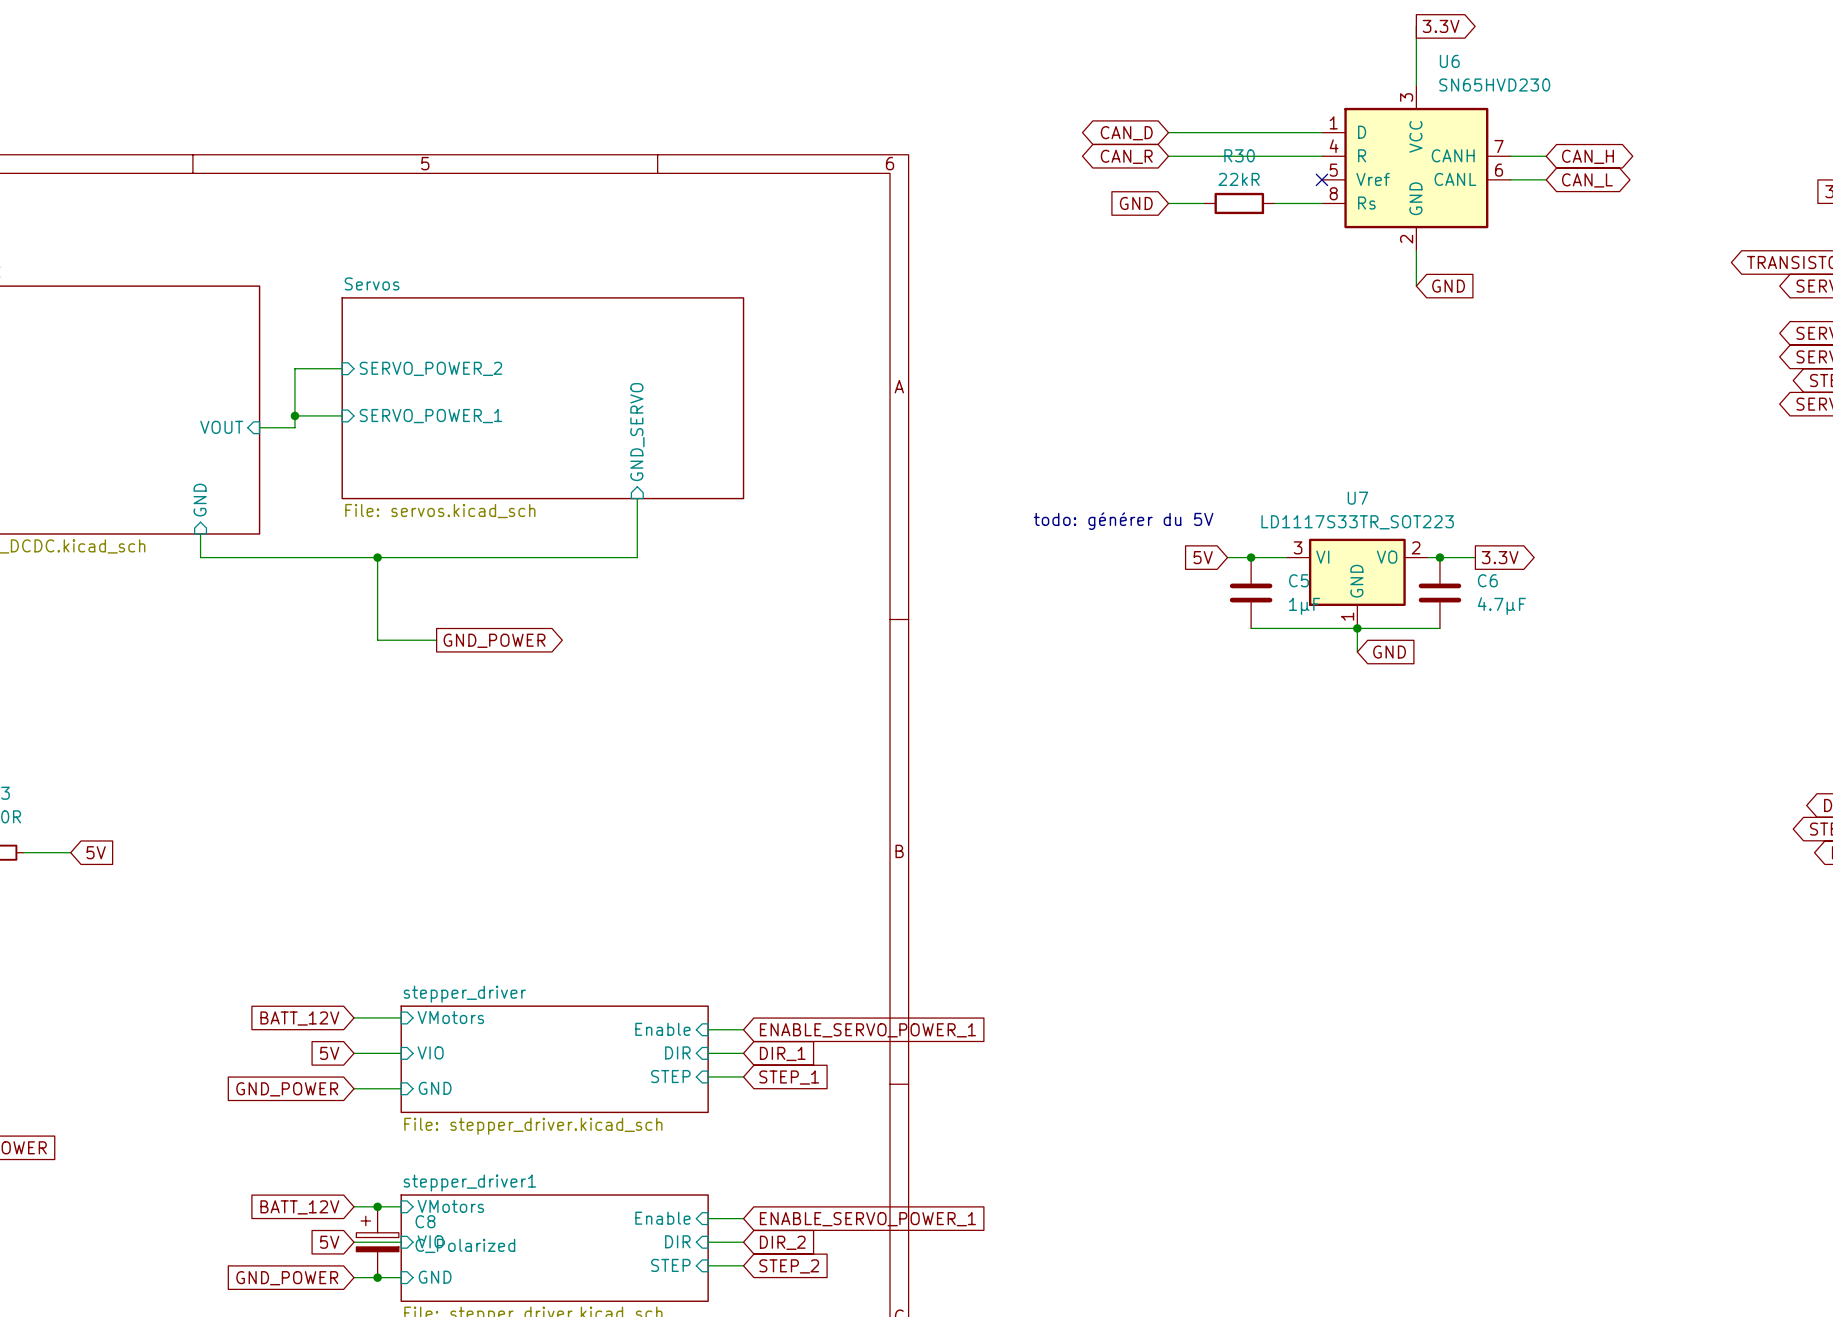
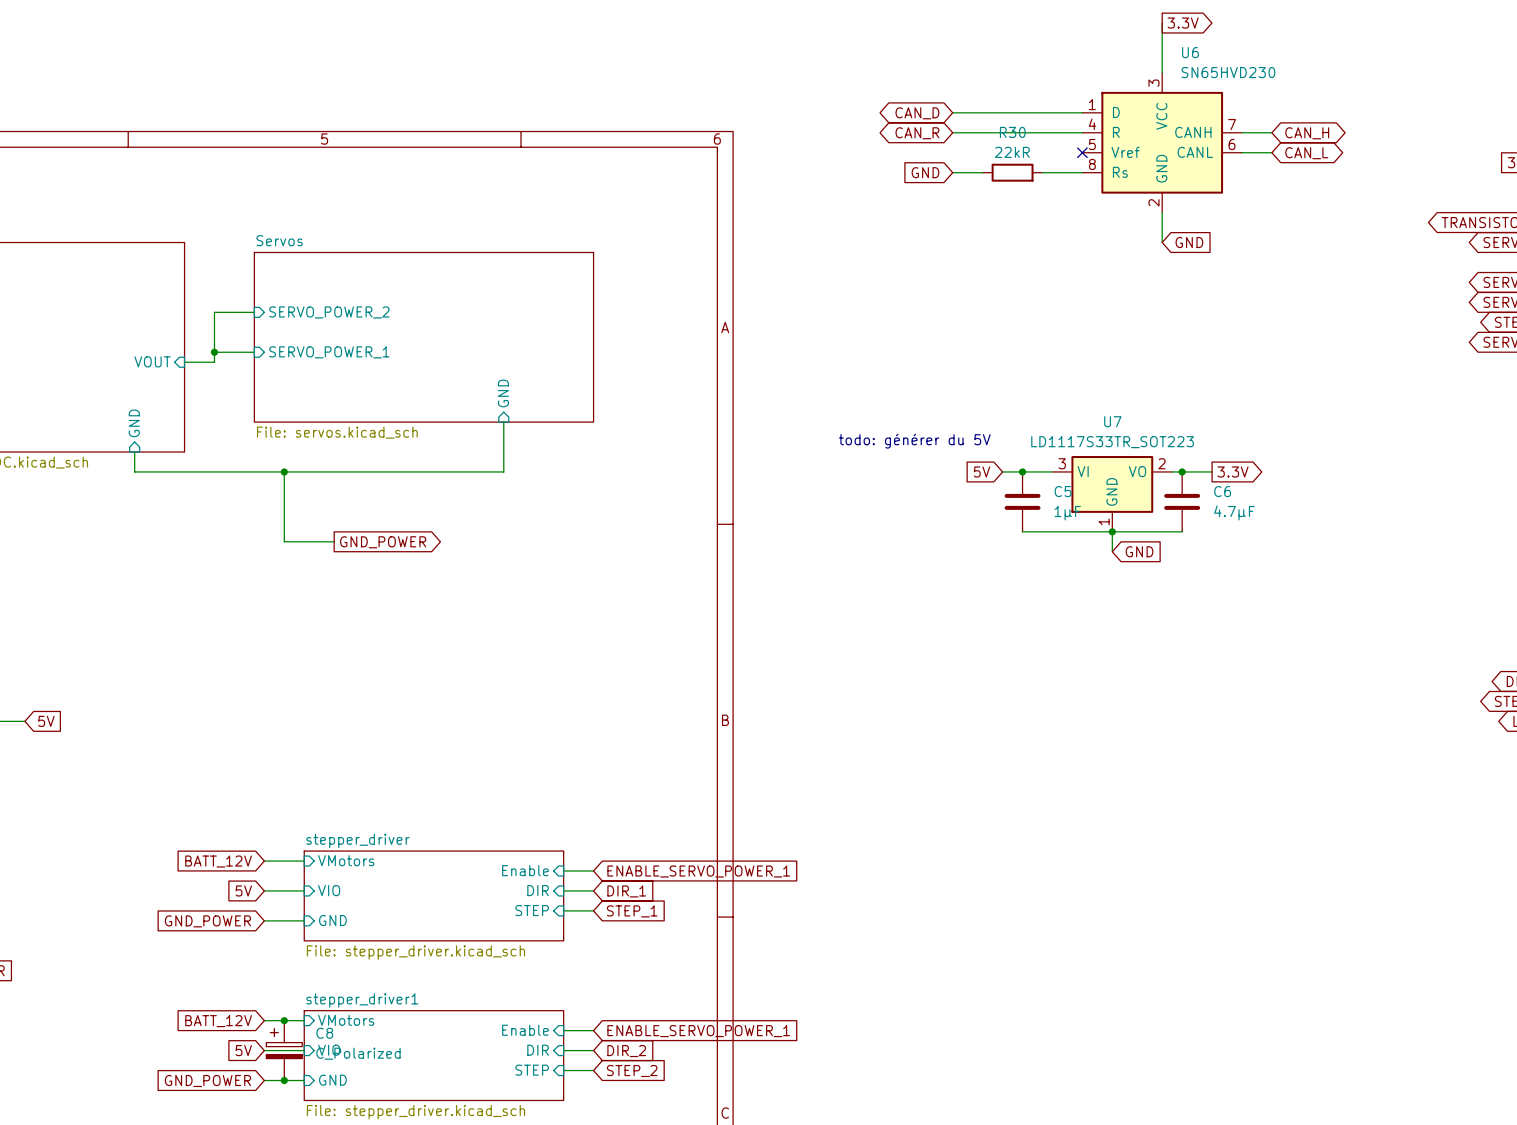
sheet pin: GND_SERVO (637, 432) -> GND (503, 393)

